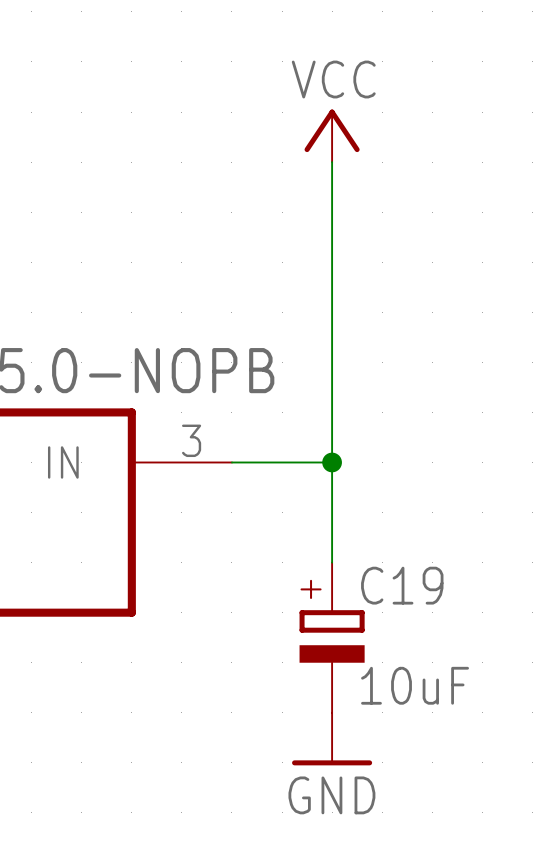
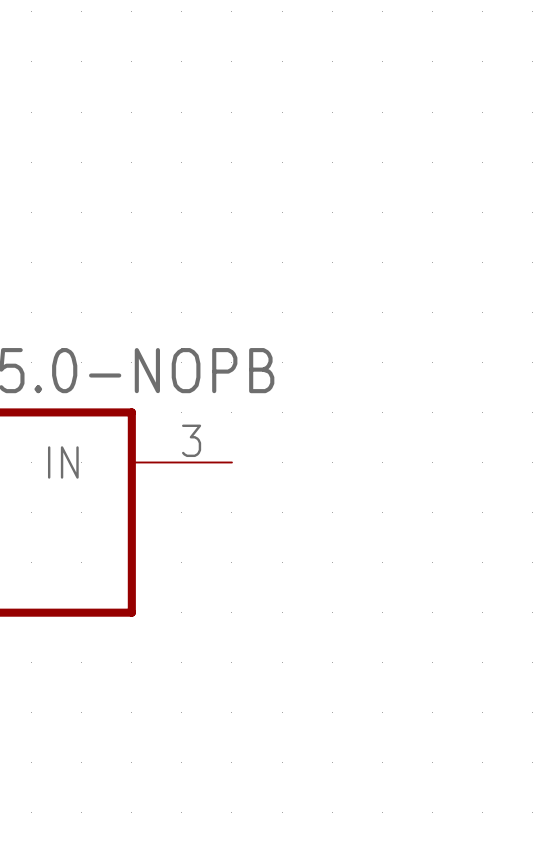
power symbol: VCC (332, 135) -> none
wire: (332, 162) (332, 562) -> none
wire: (231, 462) (332, 462) -> none
junction: (332, 462) -> none
C19: 10uF (332, 637) -> none
power symbol: GND (332, 739) -> none

